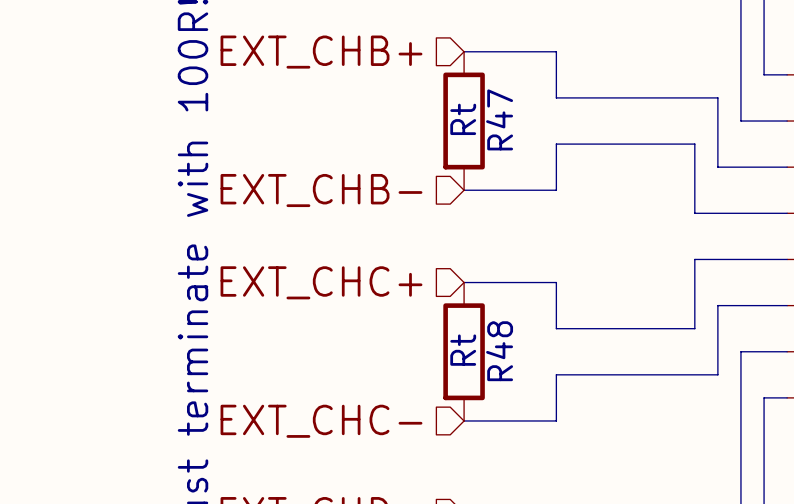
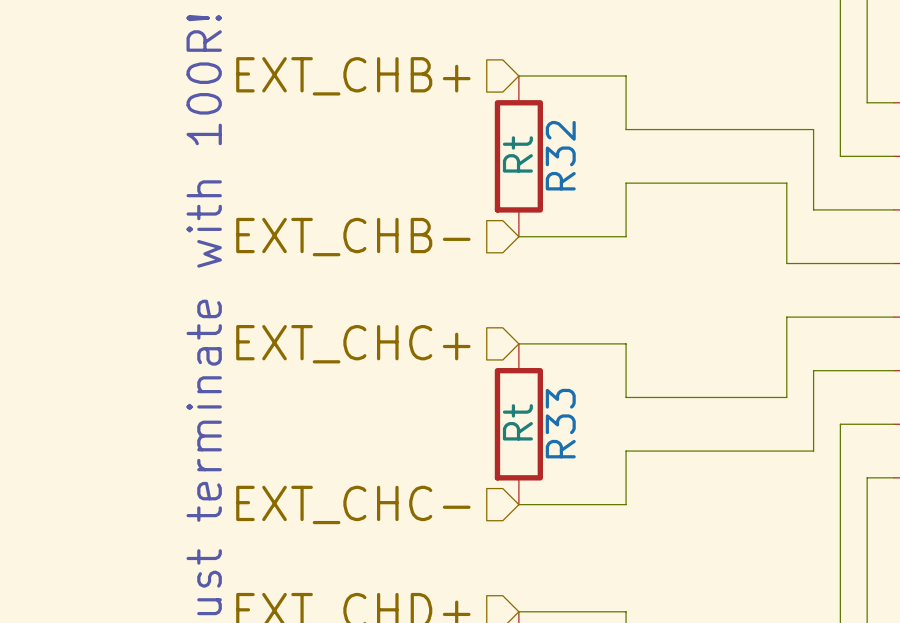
R47 name: R47 (499, 119) -> R32 (560, 155)
R48 name: R48 (499, 351) -> R33 (560, 423)

